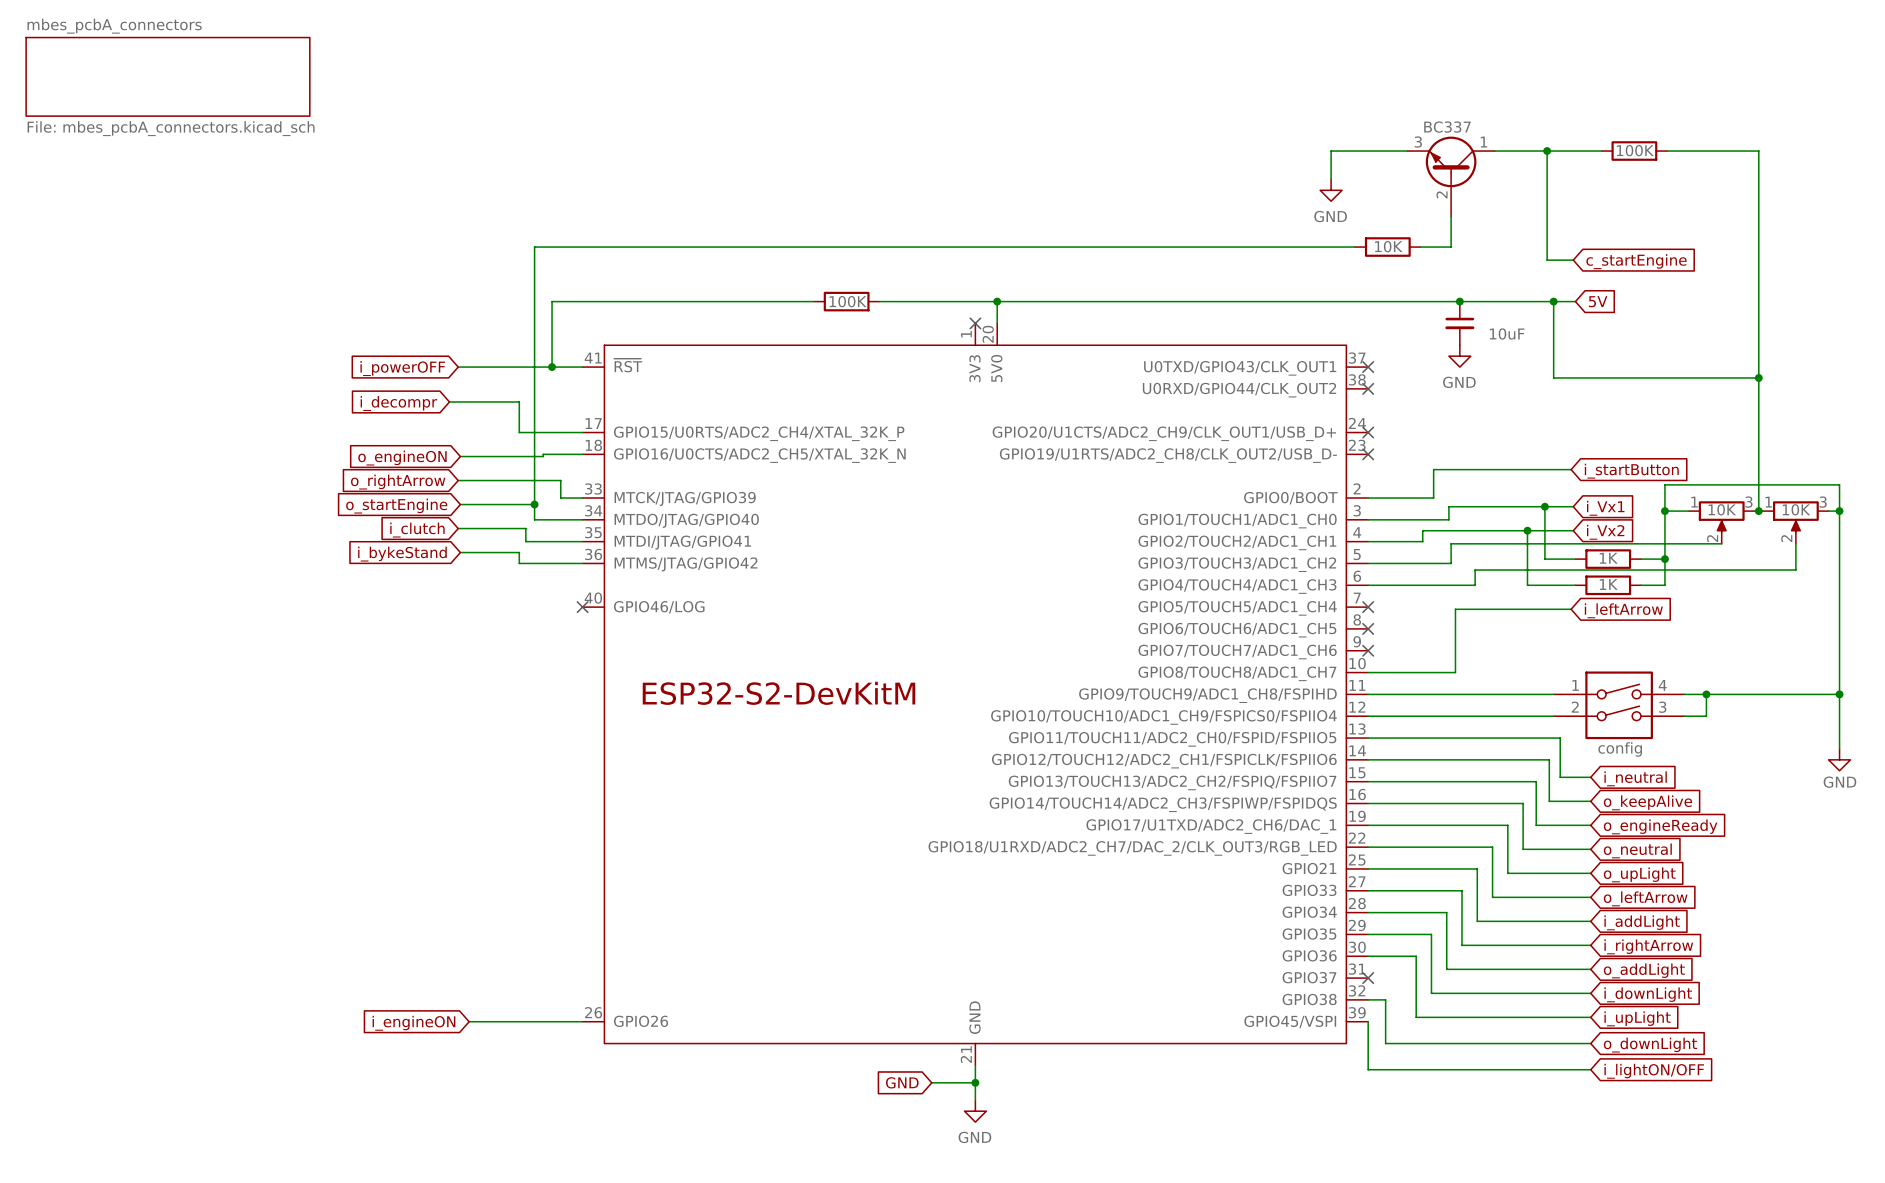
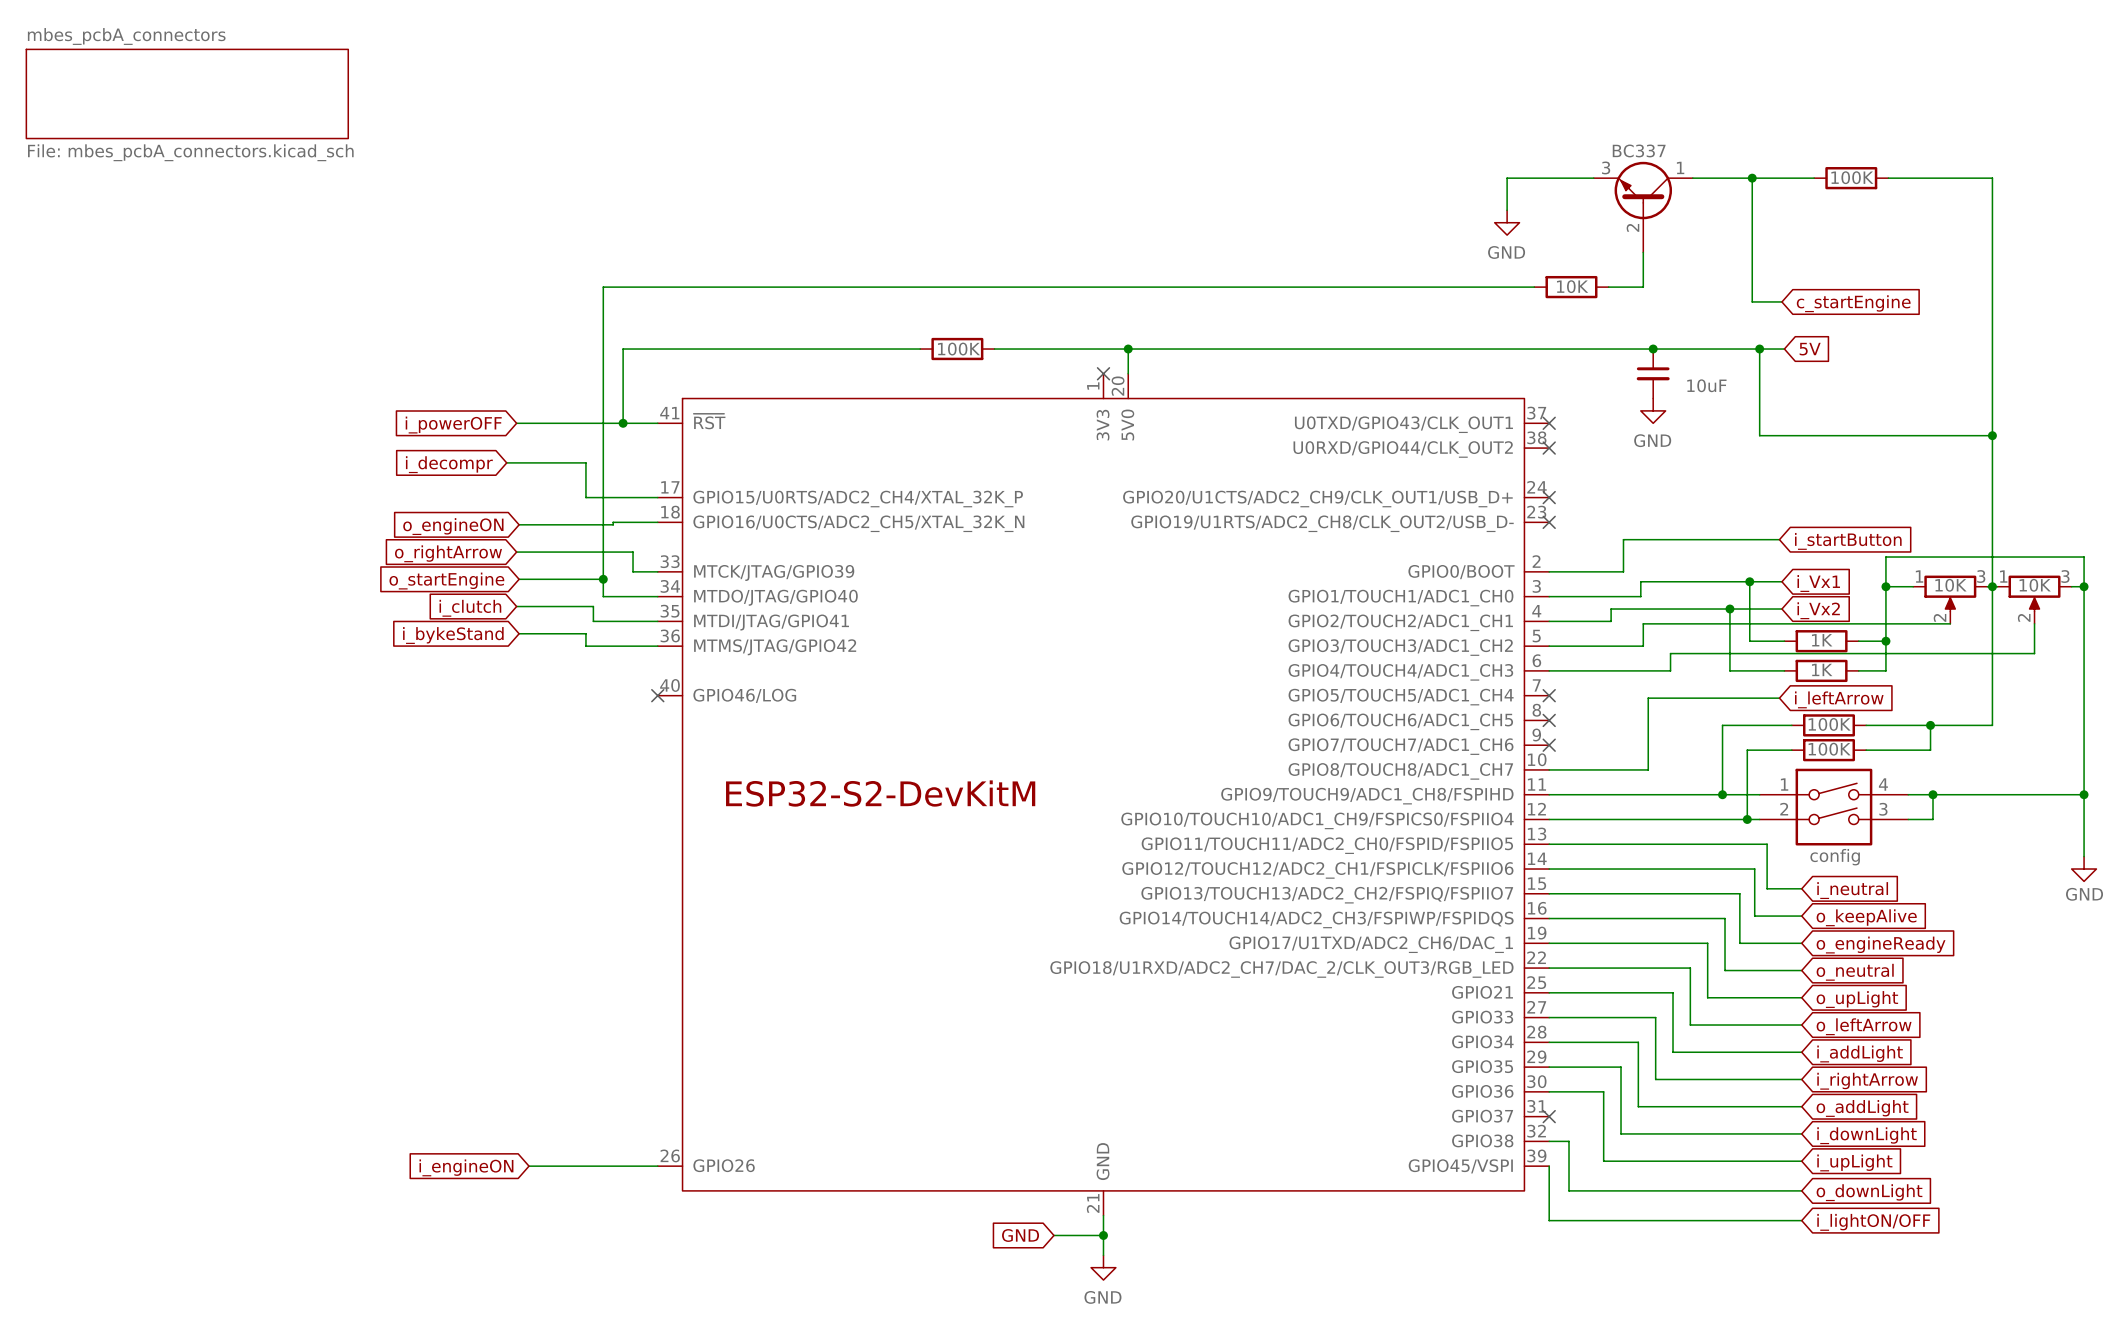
wire: none -> (1992, 586) (1992, 725) (1866, 725)
wire: none -> (1791, 725) (1722, 725) (1722, 794)
part: none -> 100K (1829, 725)
wire: none -> (1930, 725) (1930, 750) (1866, 750)
junction: none -> (1930, 725)
wire: none -> (1791, 750) (1747, 750) (1747, 819)
part: none -> 100K (1829, 750)
junction: none -> (1722, 794)
junction: none -> (1747, 819)

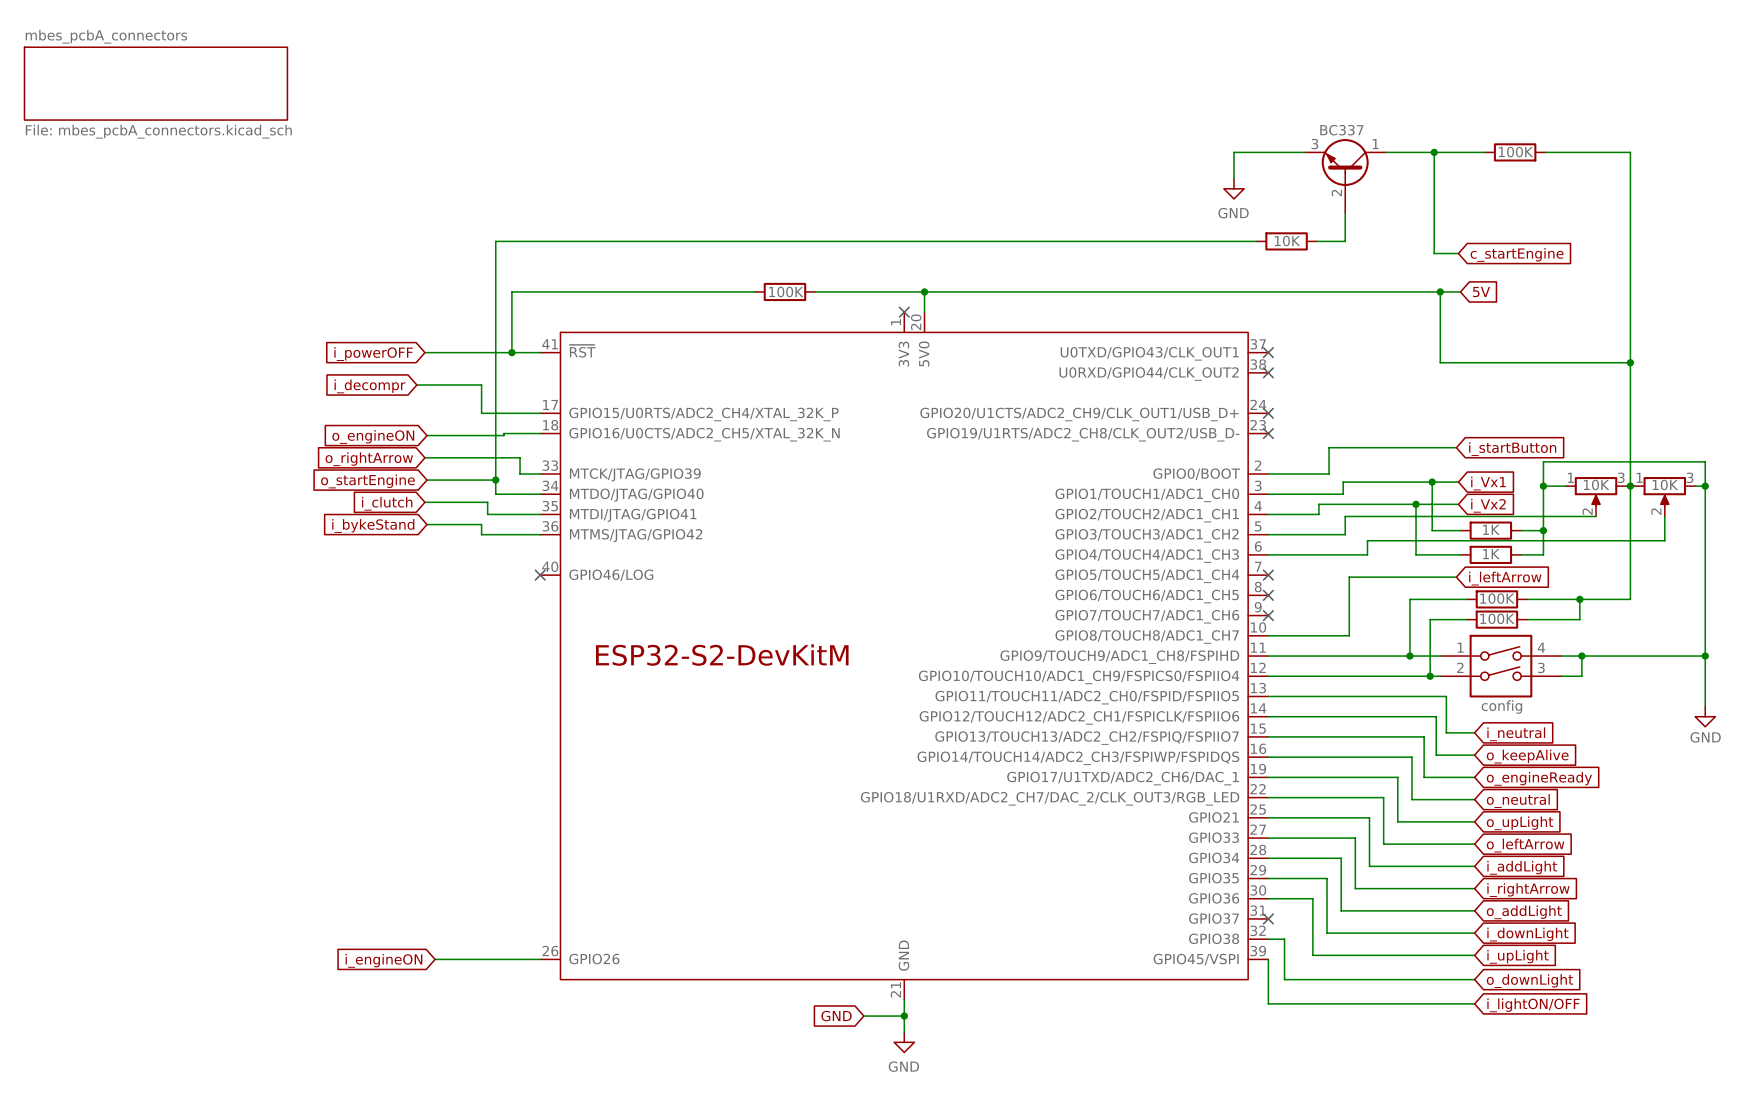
junction: (1653, 349) -> none
part: 10uF (1653, 373) -> none
power symbol: GND (1653, 410) -> none

